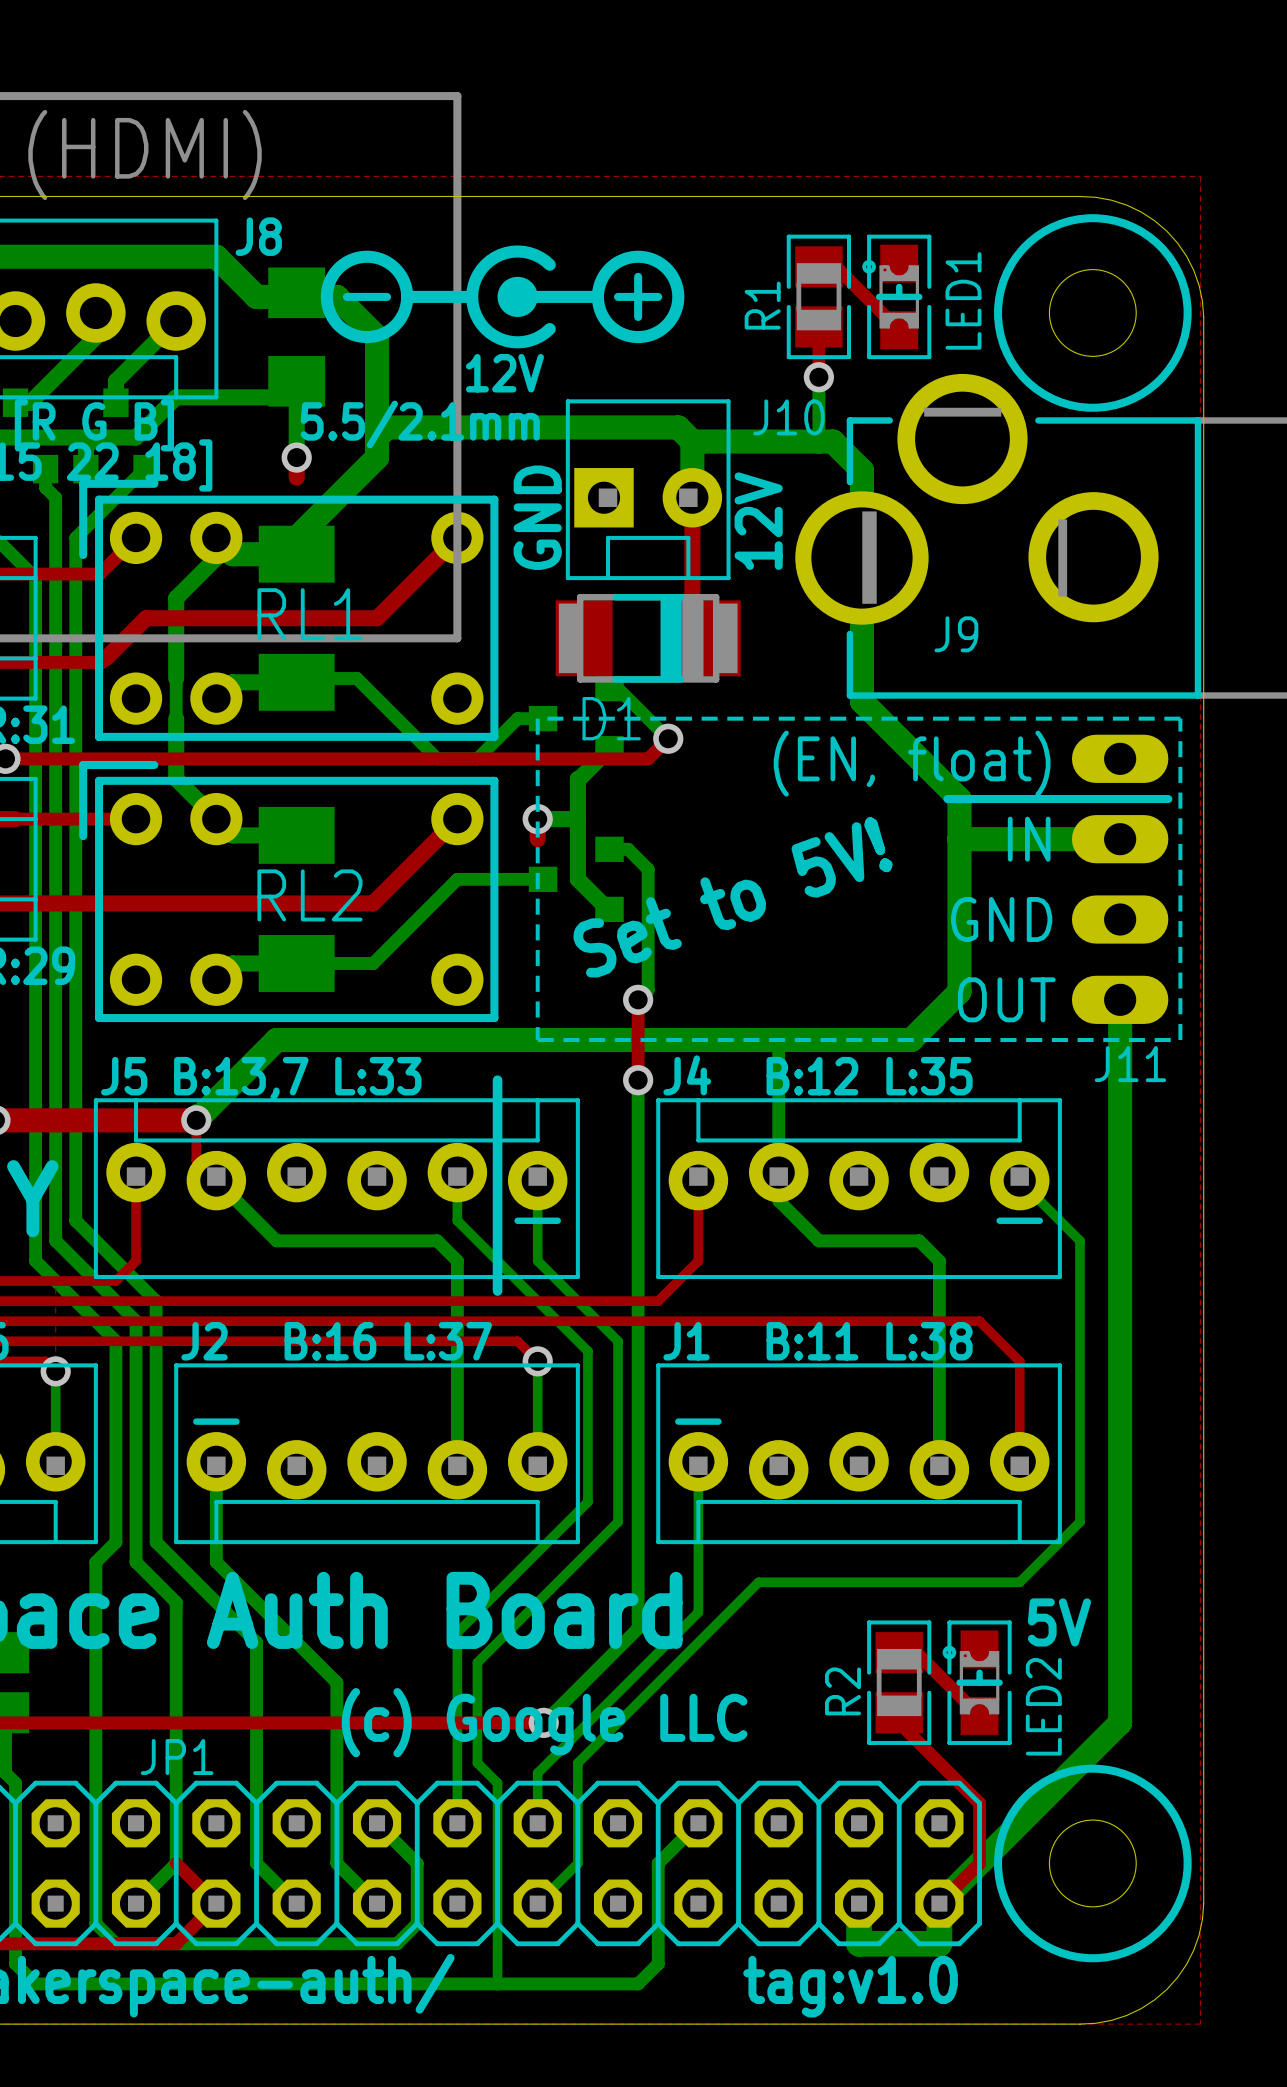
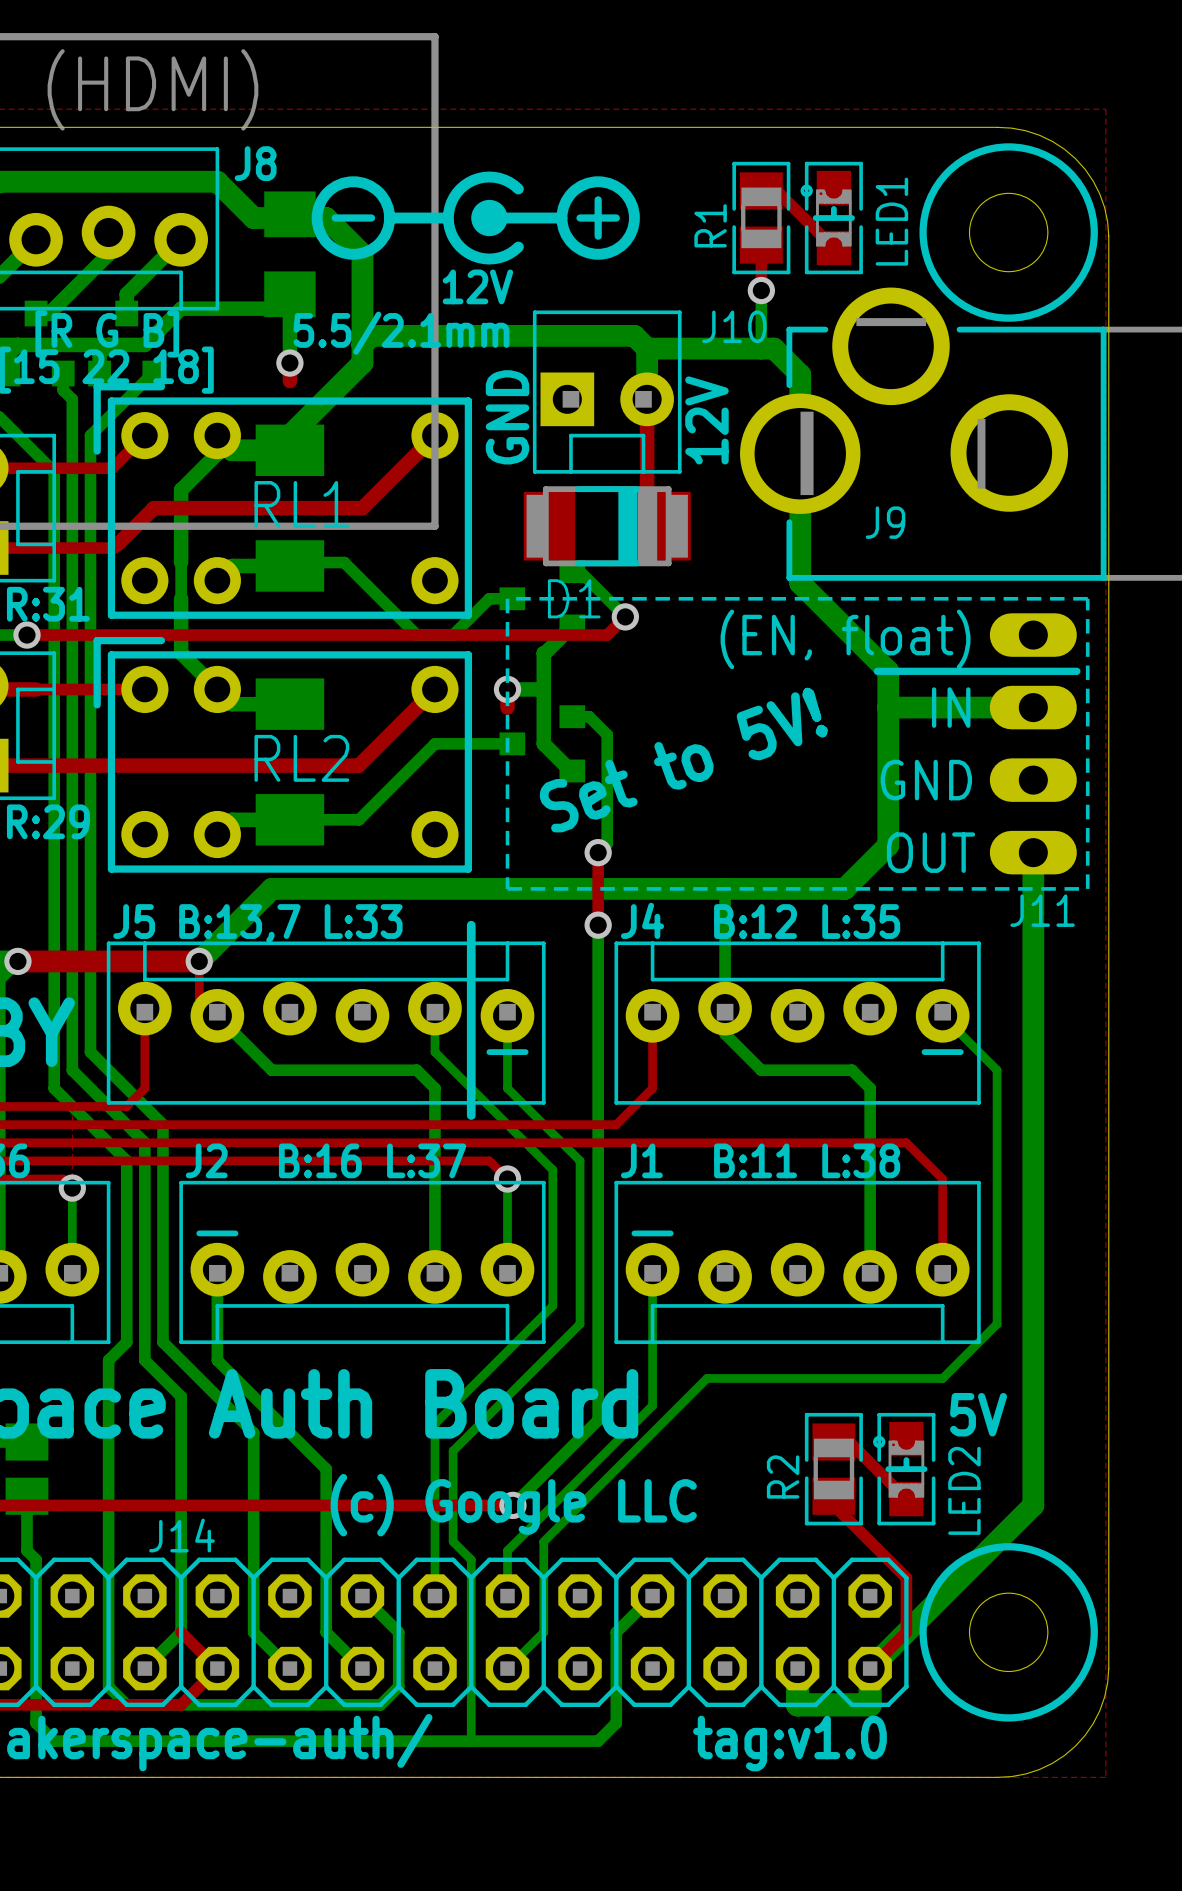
JP1 name: JP1 (177, 1757) -> J14 (181, 1535)

